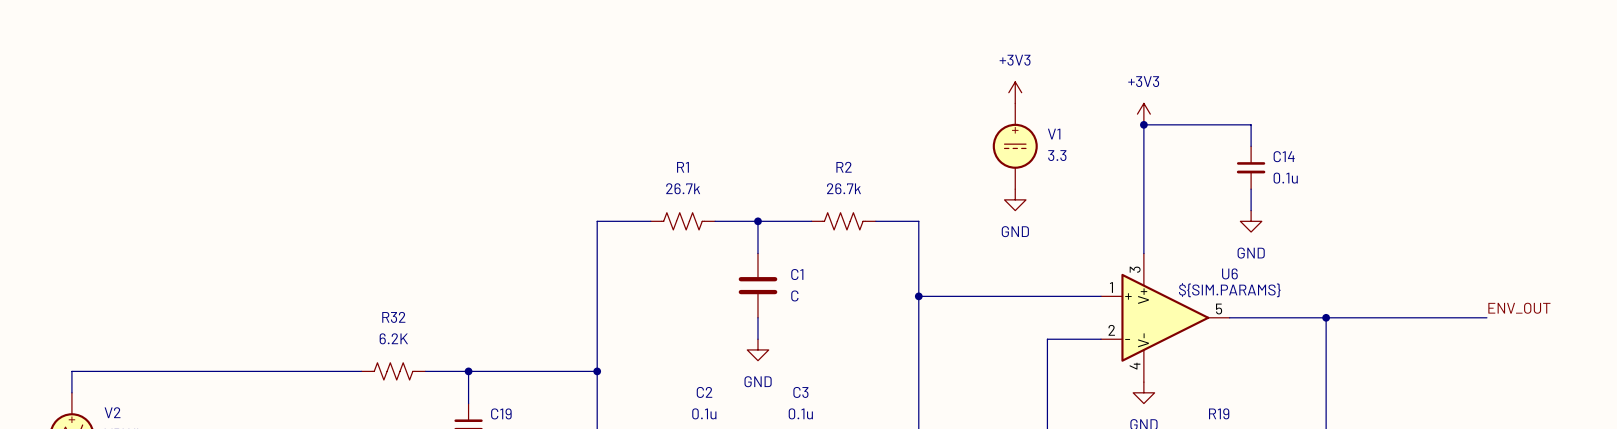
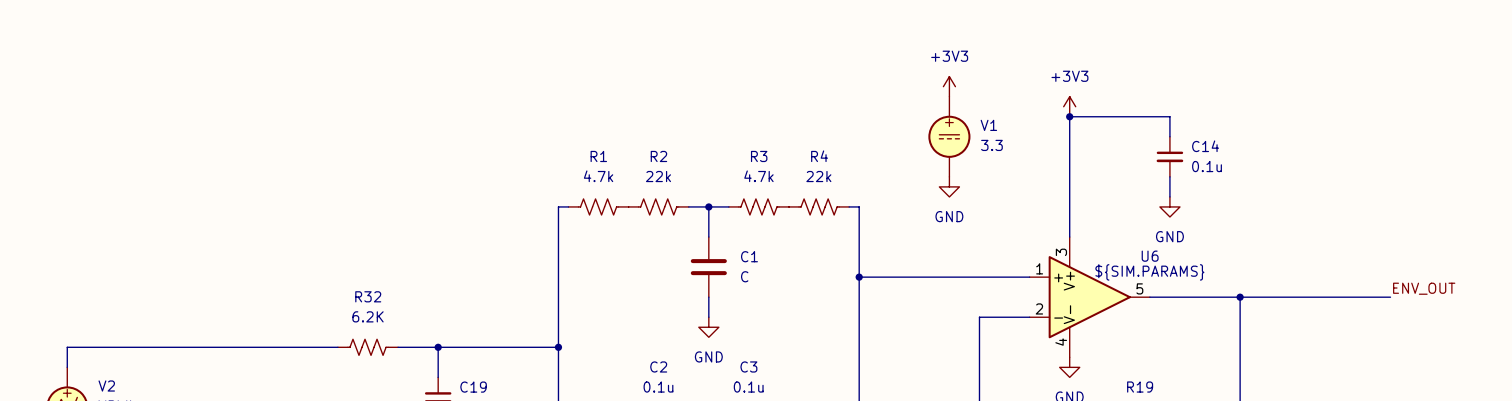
R1 value: 26.7k (683, 188) -> 4.7k (598, 176)
R2 value: 26.7k (843, 188) -> 22k (658, 176)
wire: (607, 221) (650, 221) -> none
R1 position: (682, 221) -> (598, 206)
R3: none -> 4.7k (758, 206)
R2 position: (843, 221) -> (658, 206)
R4: none -> 22k (819, 206)

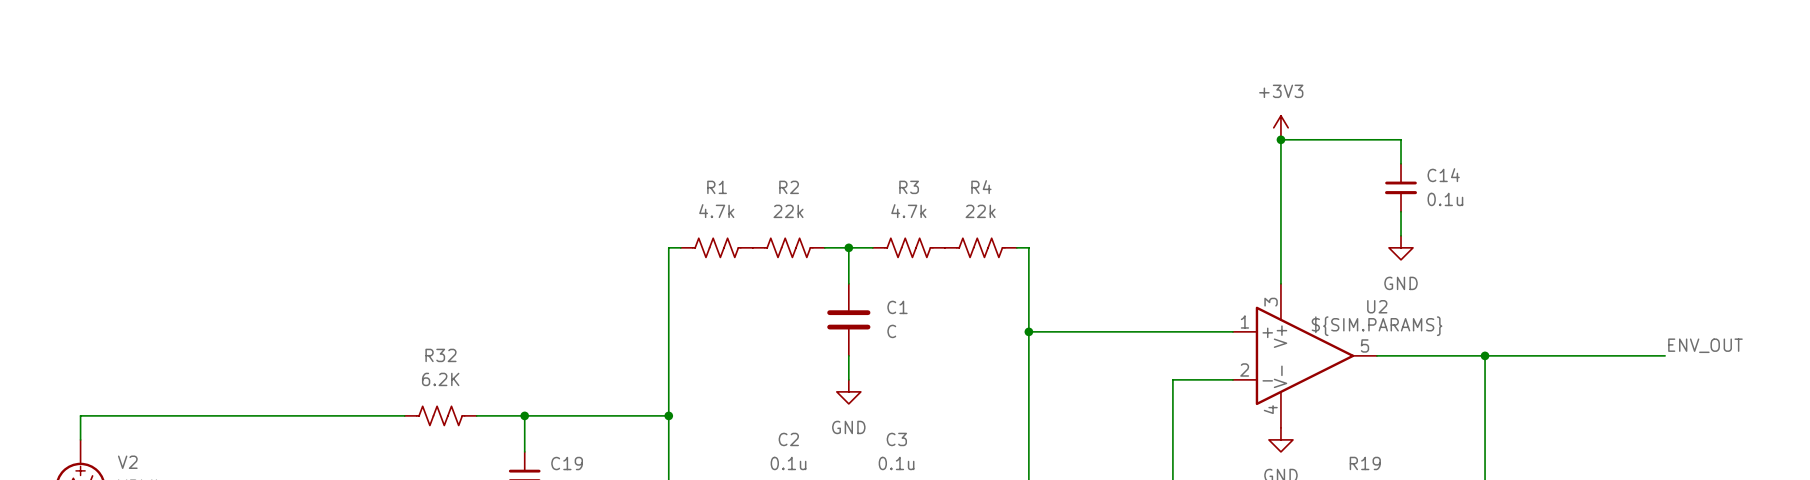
power symbol: +3V3 (949, 86) -> none
V1: 3.3 (949, 136) -> none
power symbol: GND (949, 186) -> none
U6 name: U6 (1150, 256) -> U2 (1377, 306)

